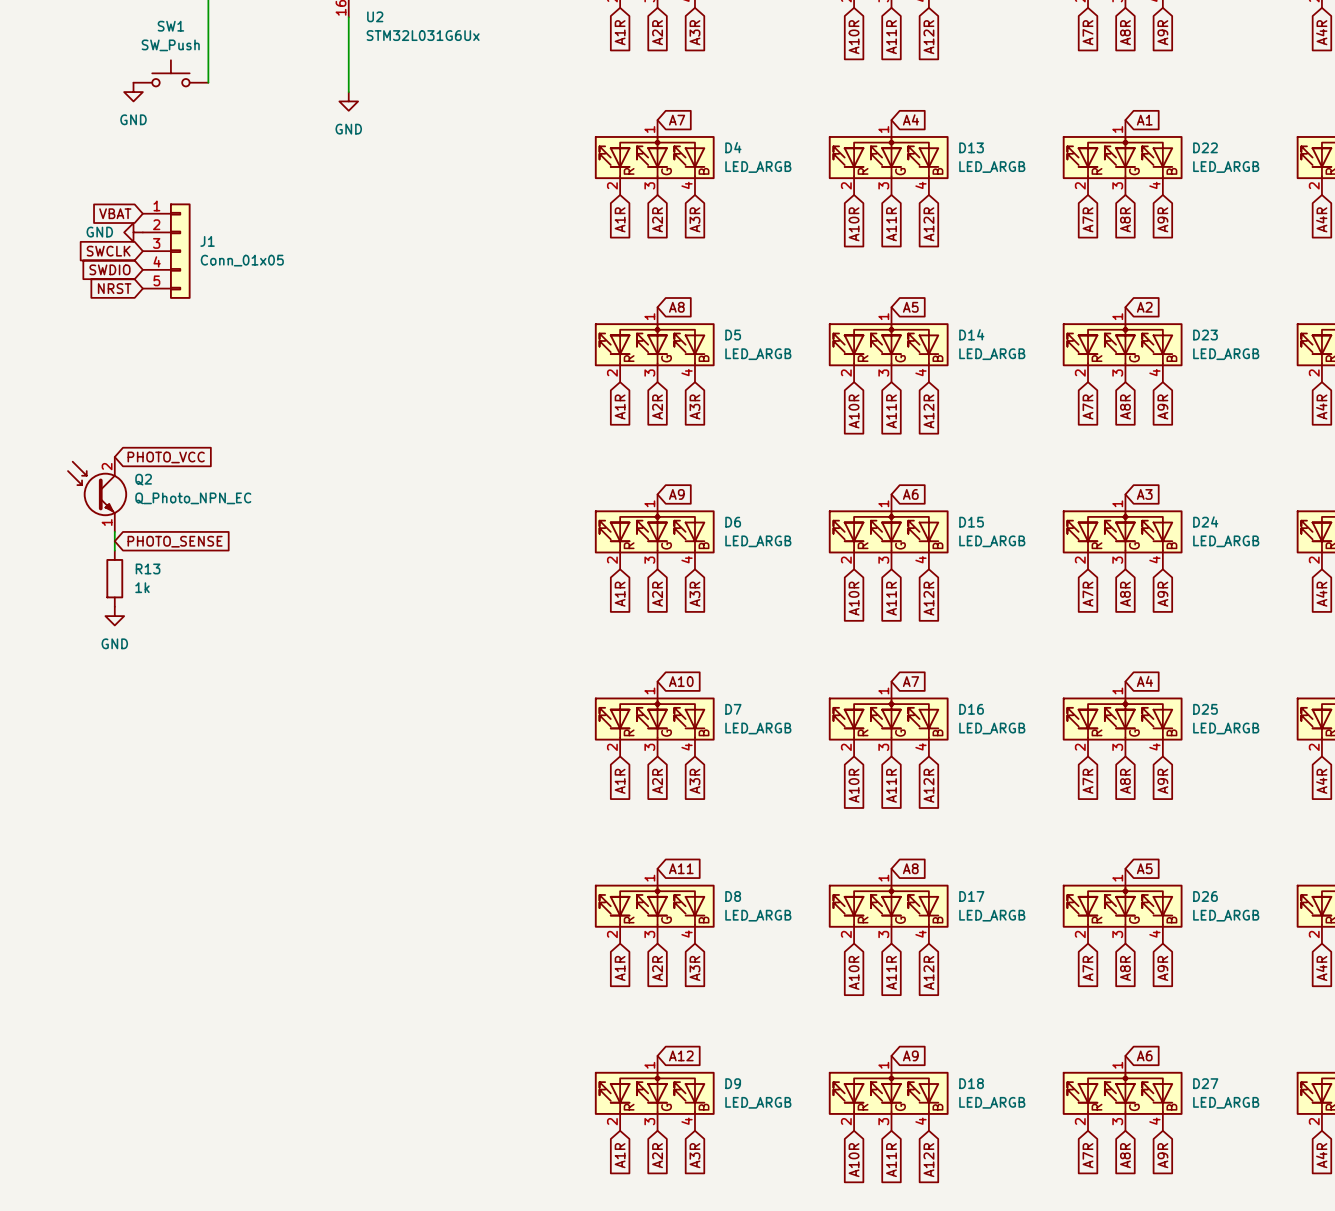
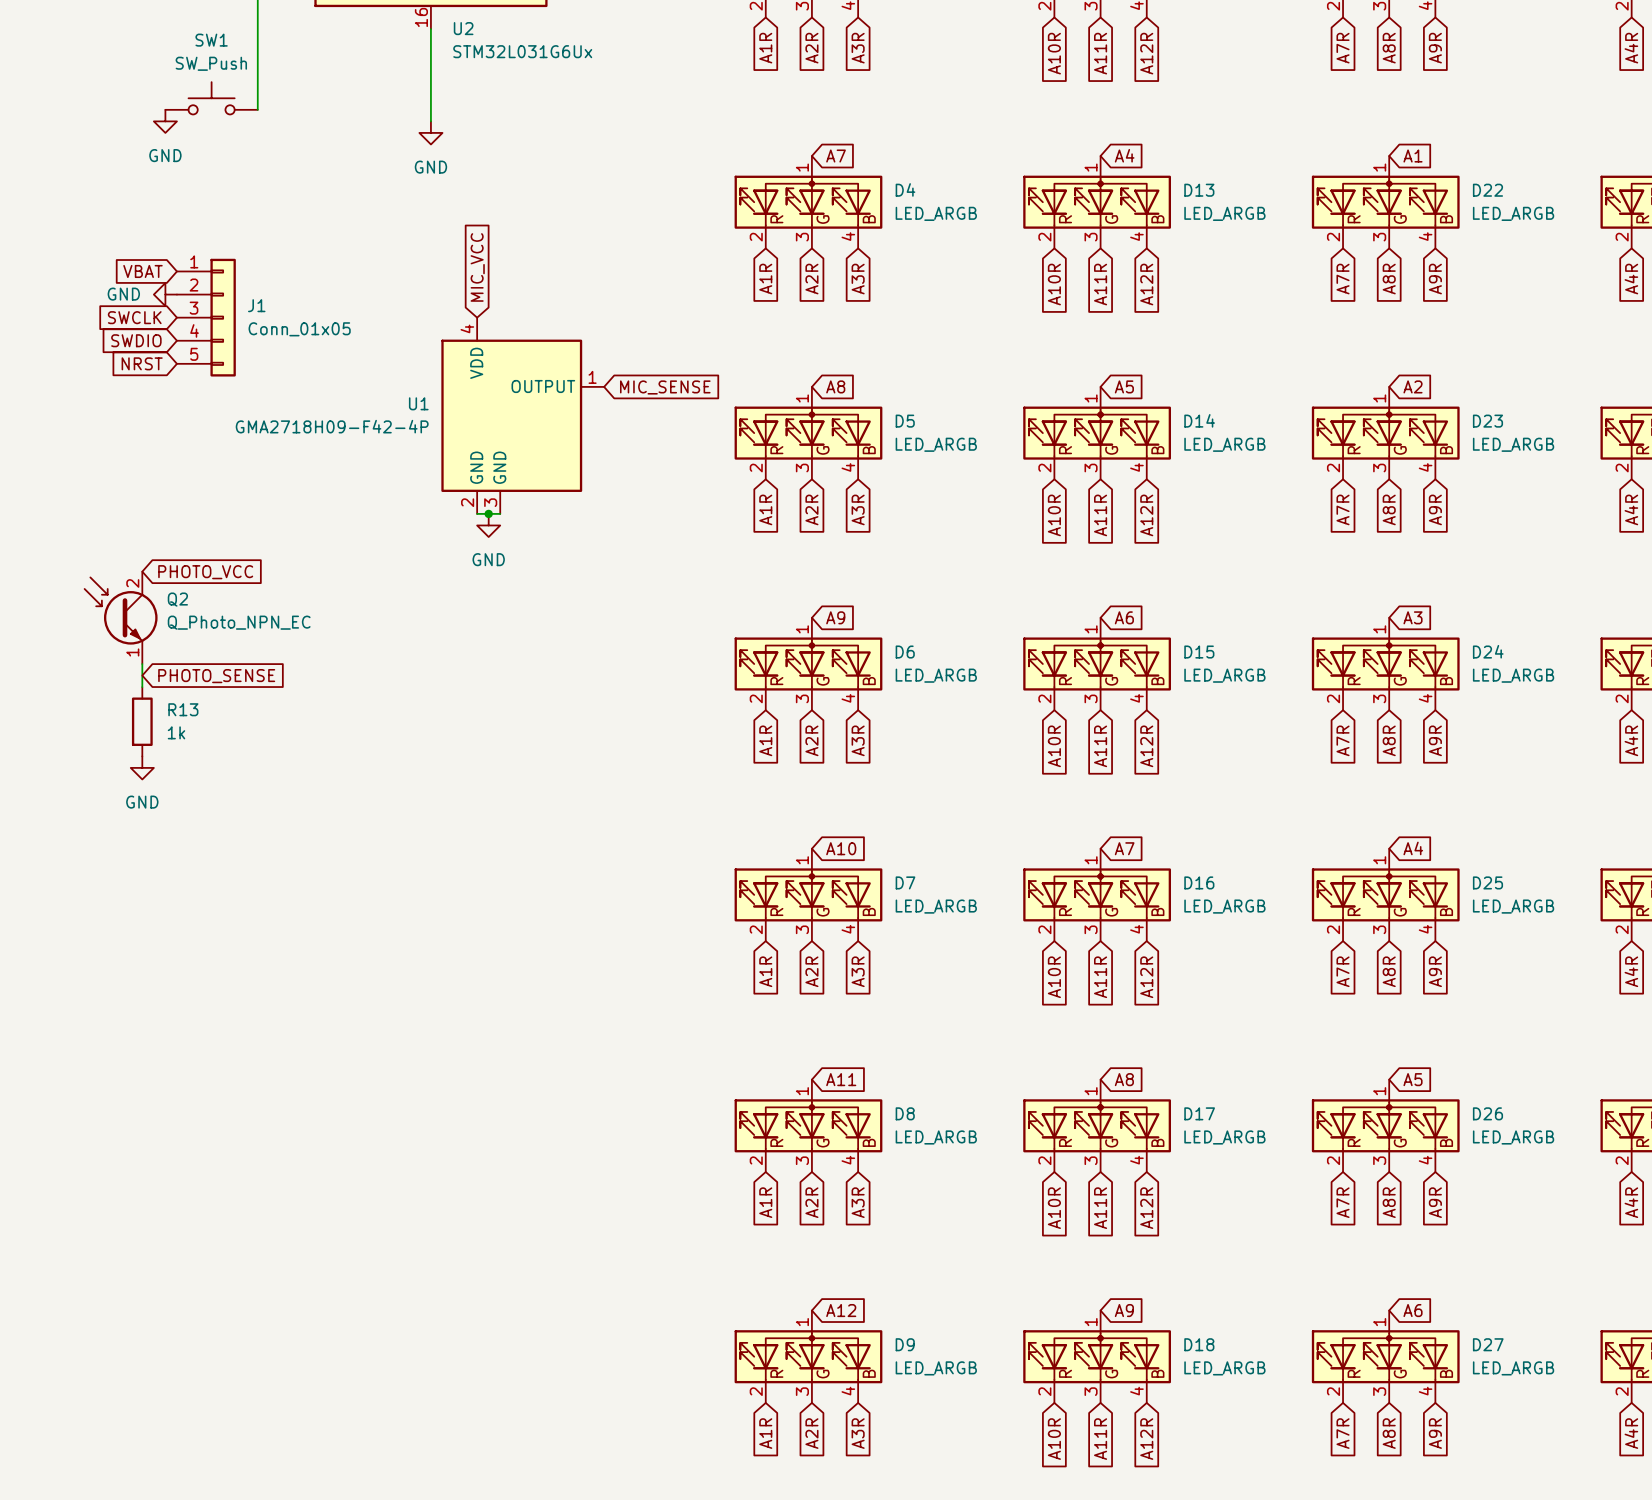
global label: none -> MIC_VCC (477, 267)
global label: none -> MIC_SENSE (665, 387)
U1: none -> GMA2718H09-F42-4P (522, 415)
wire: none -> (477, 513) (500, 513)
junction: none -> (488, 513)
power symbol: none -> GND (488, 525)

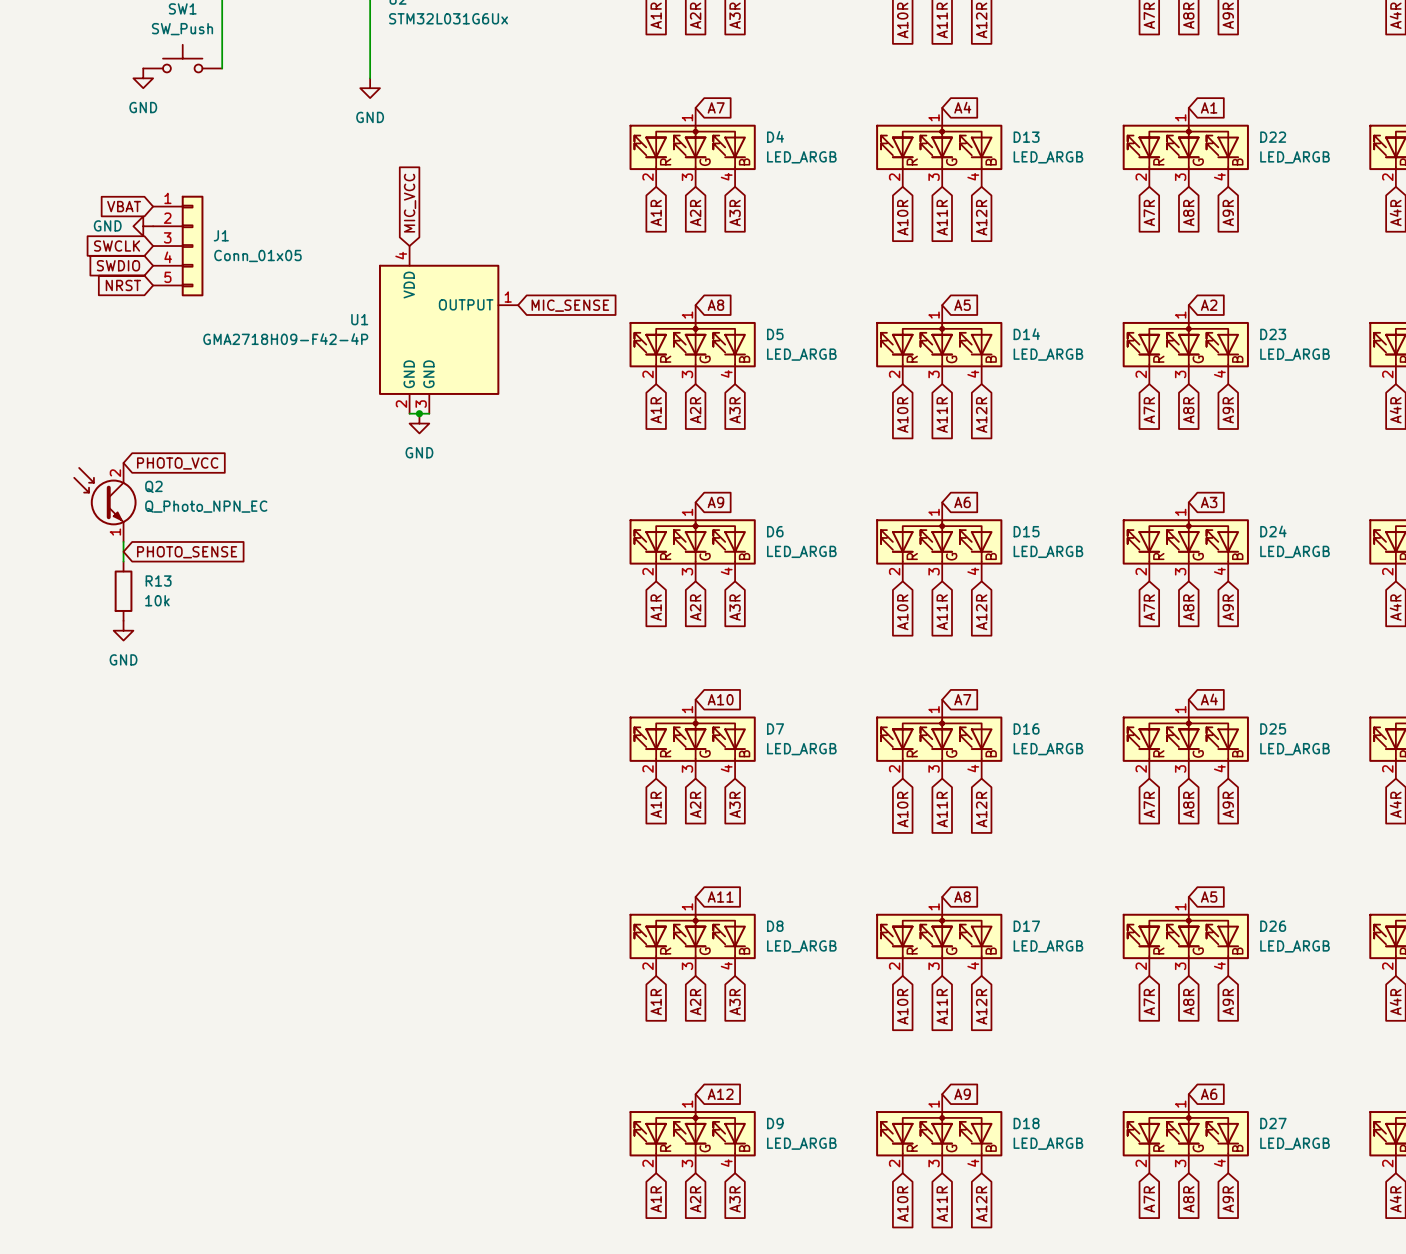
R13 value: 1k (176, 732) -> 10k (157, 600)

